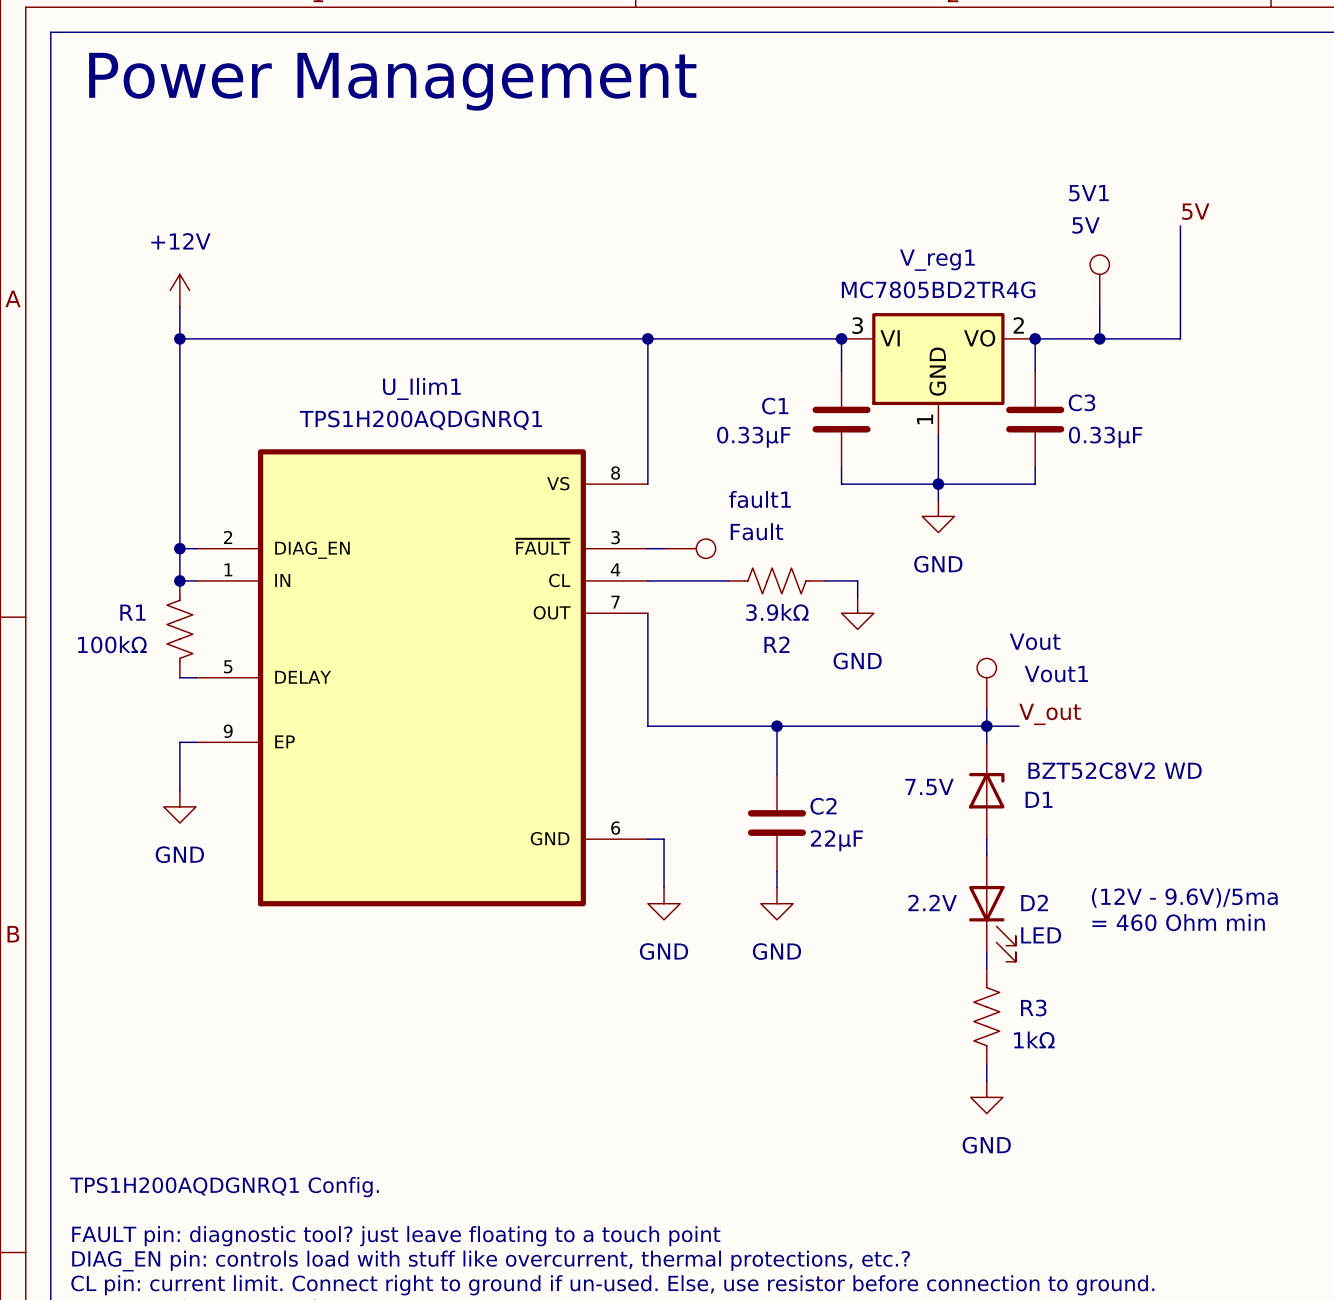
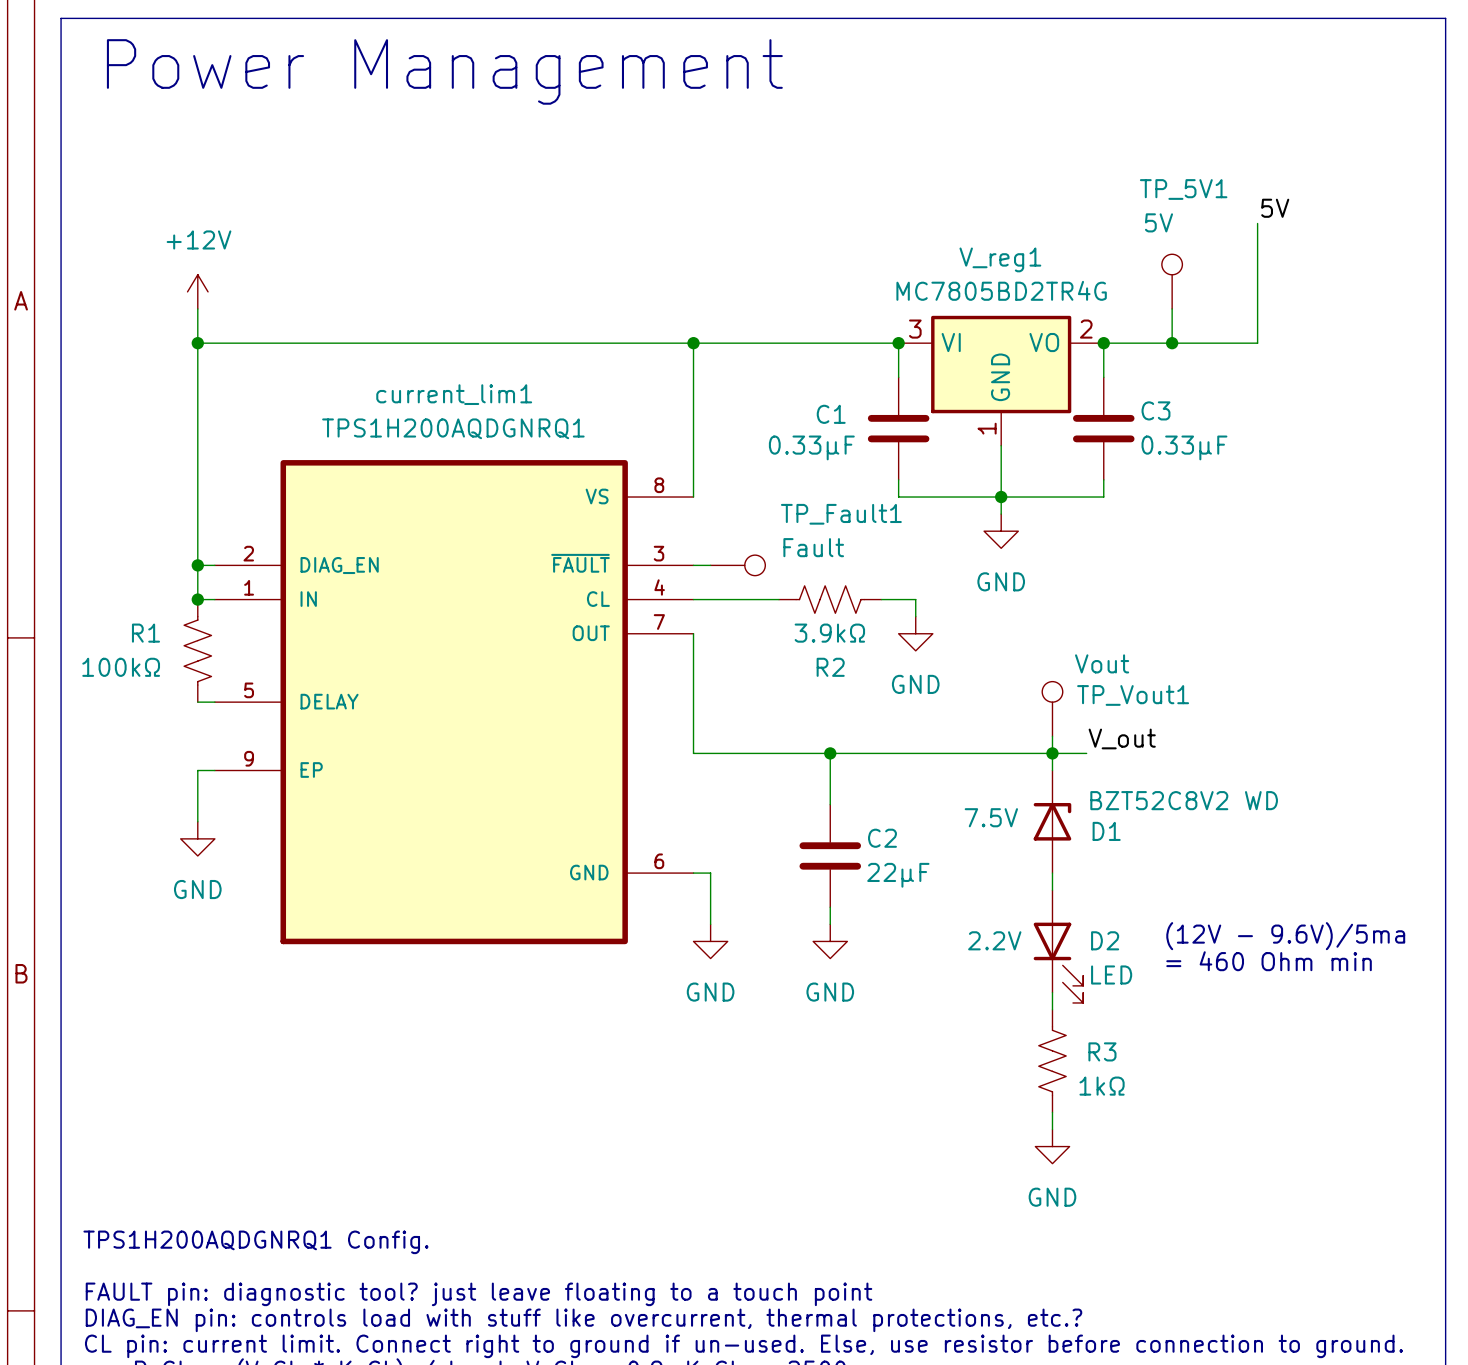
5V1 name: 5V1 (1088, 193) -> TP_5V1 (1183, 189)
U_Ilim1 name: U_Ilim1 (421, 388) -> current_lim1 (454, 394)
fault1 name: fault1 (759, 499) -> TP_Fault1 (841, 514)
Vout1 name: Vout1 (1056, 674) -> TP_Vout1 (1133, 695)

